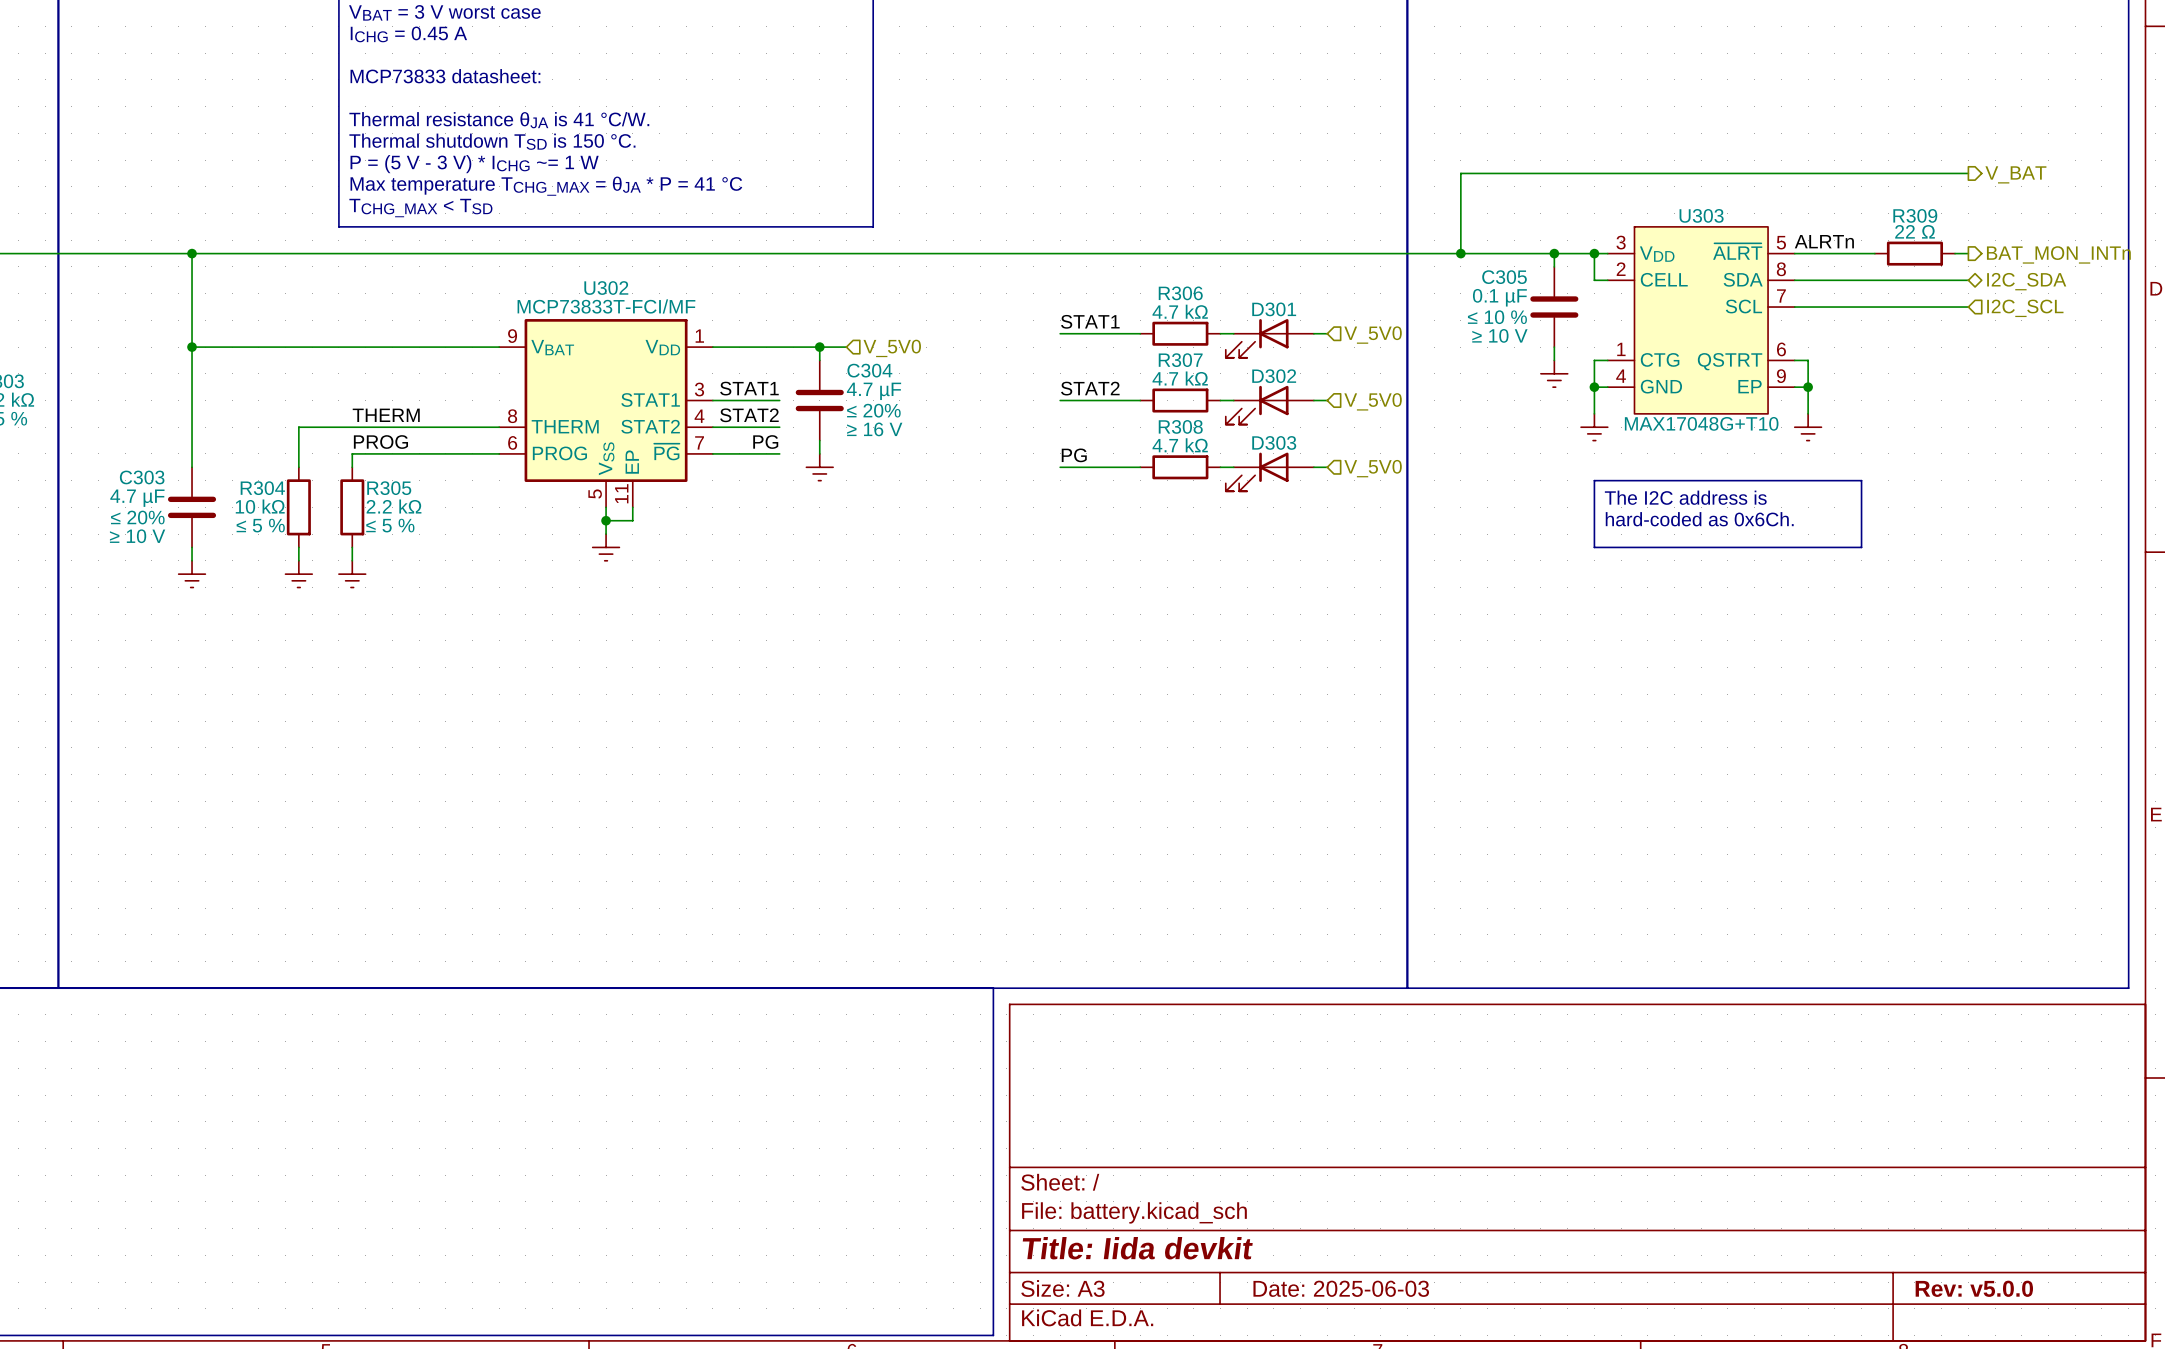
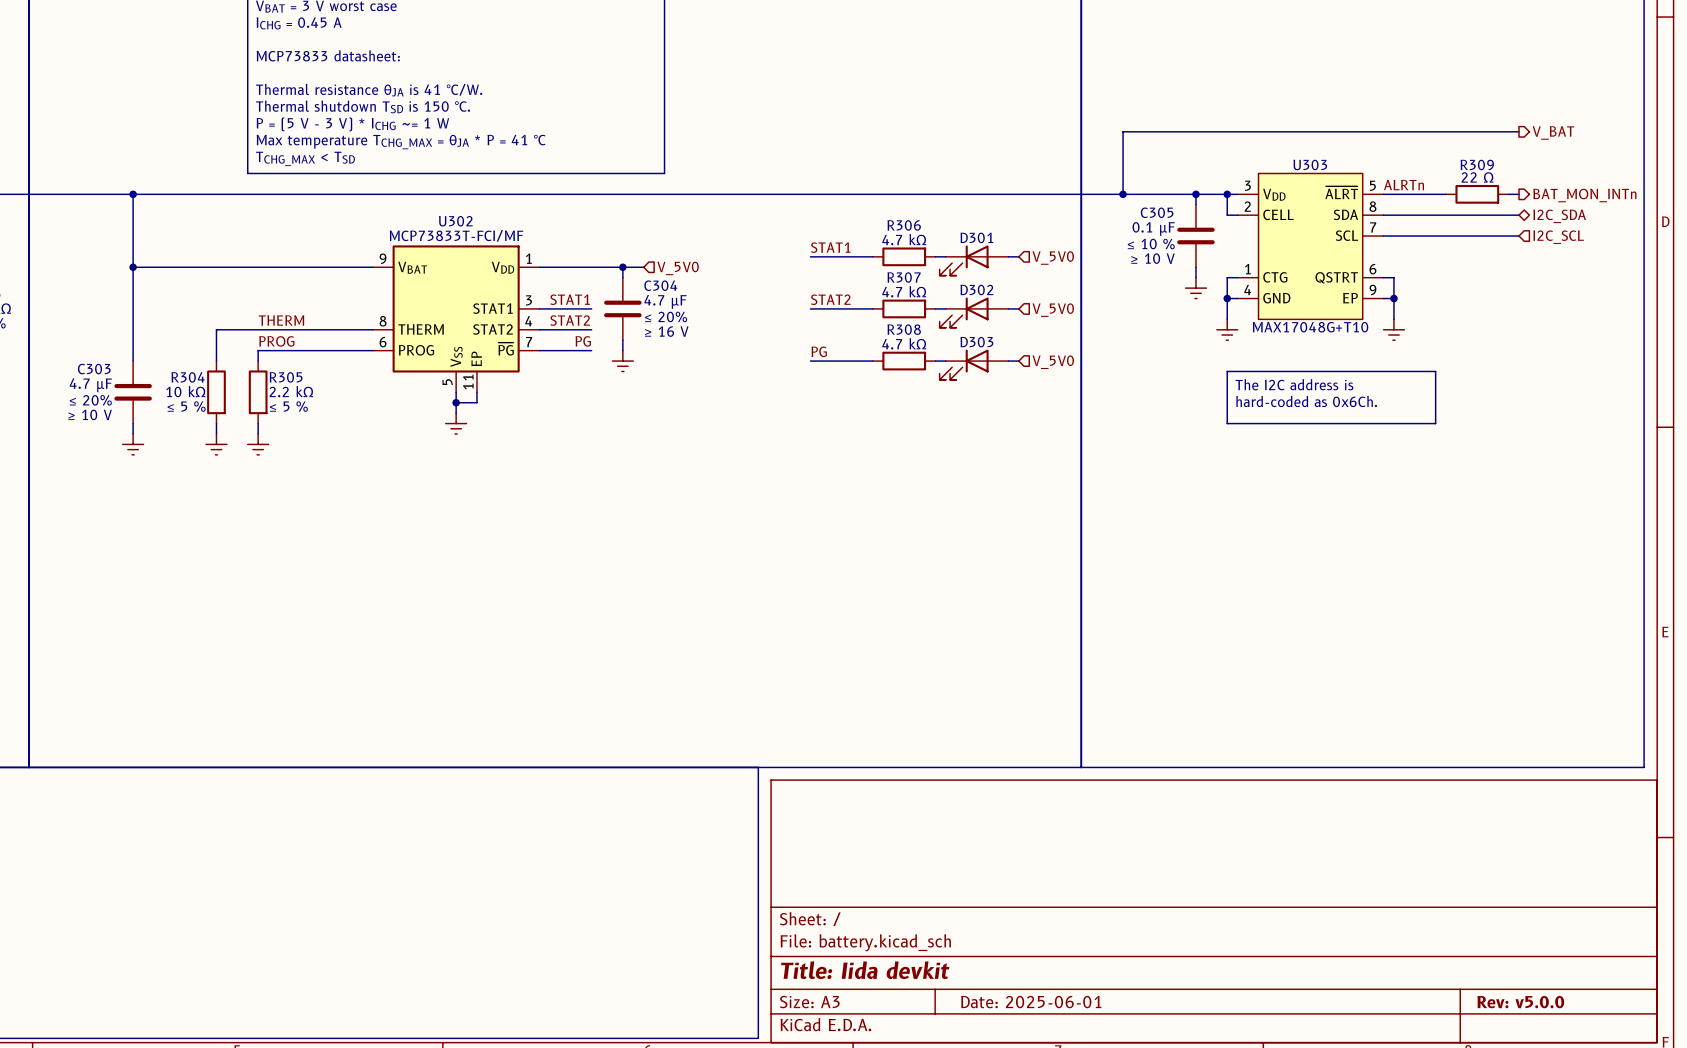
title block: Date: 2025-06-03 (1341, 1288) -> Date: 2025-06-01 (1031, 1002)

